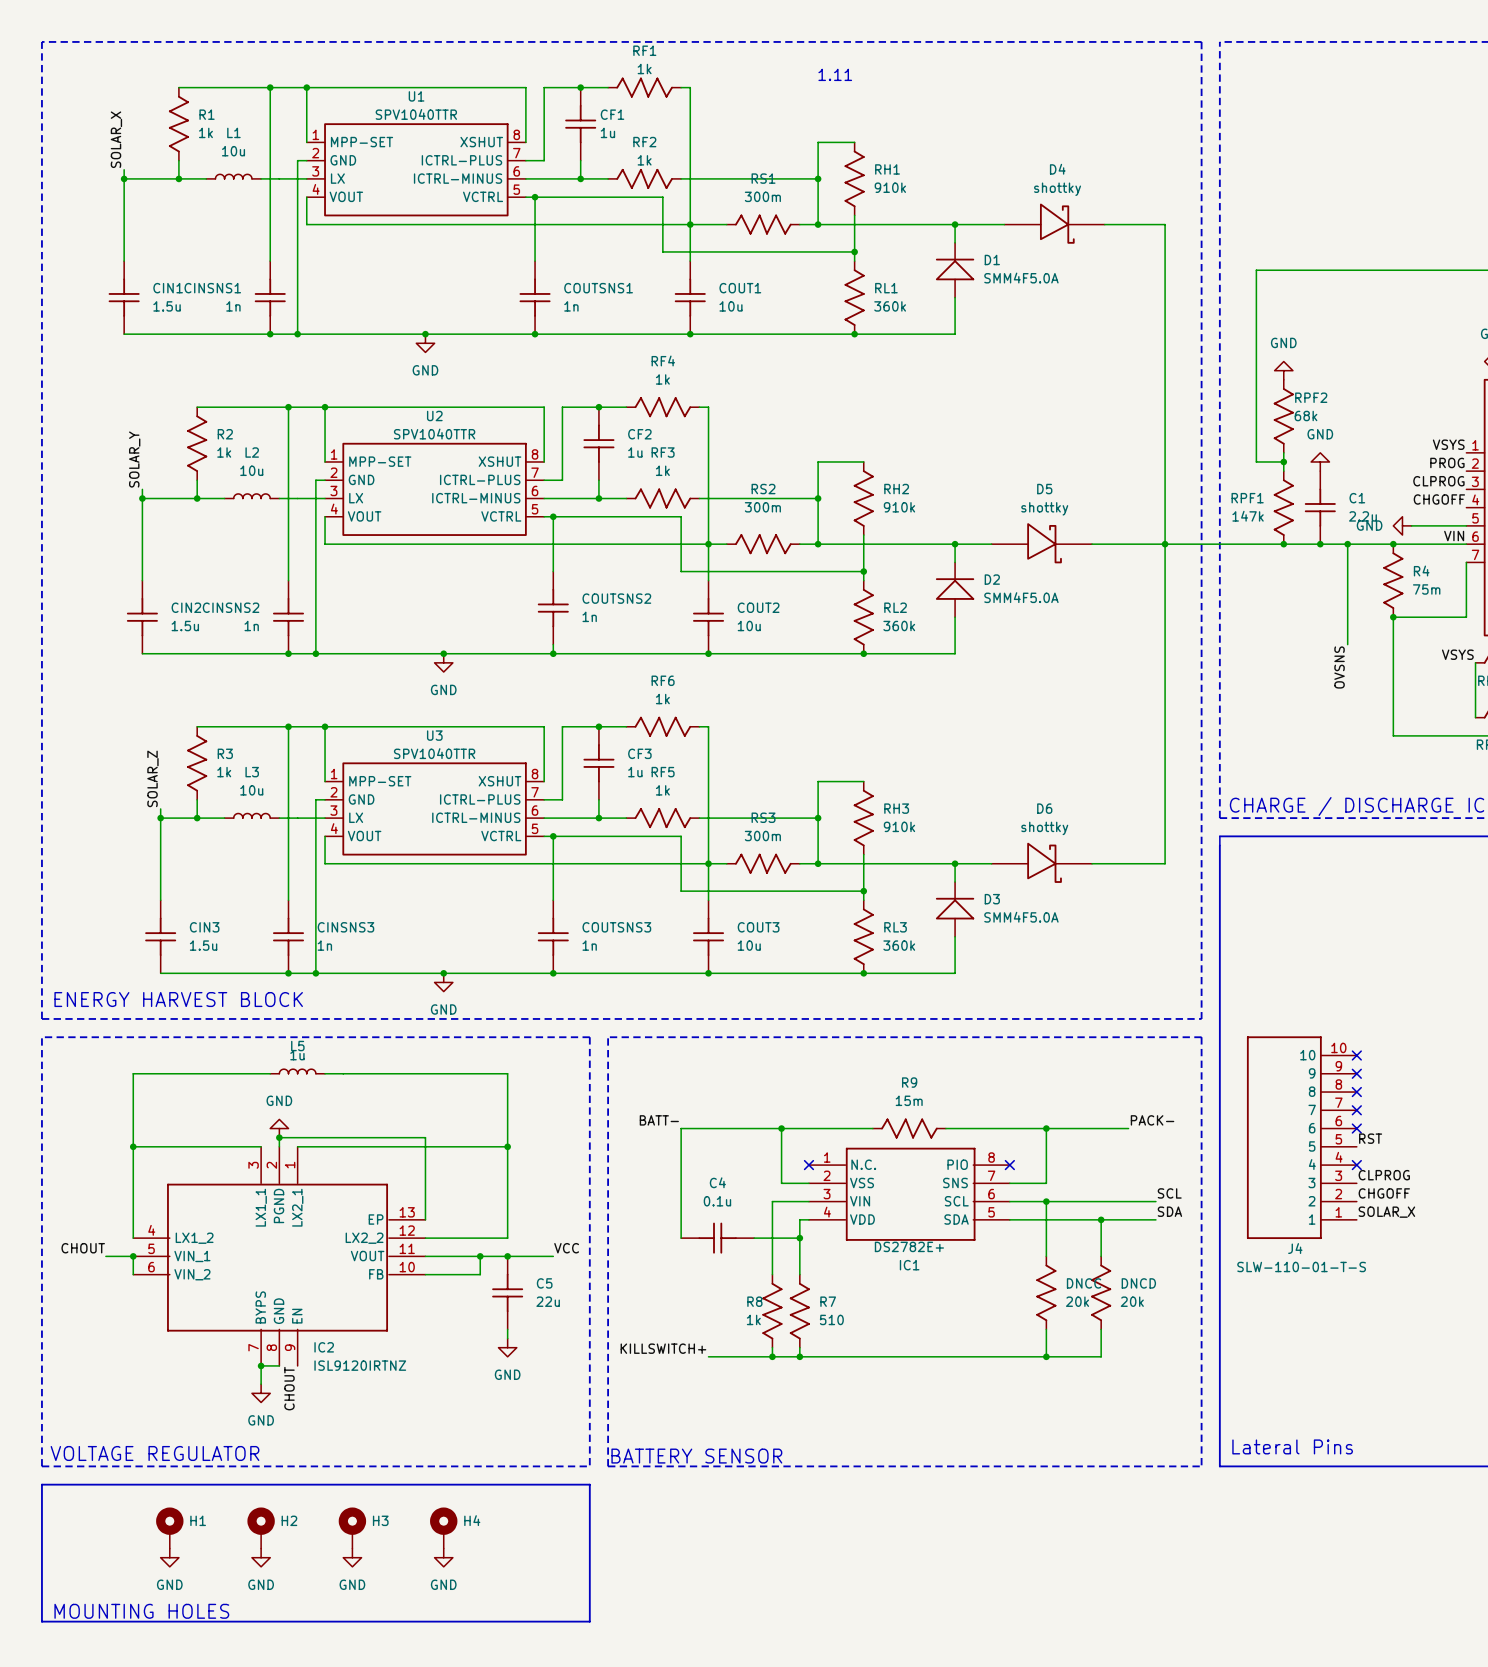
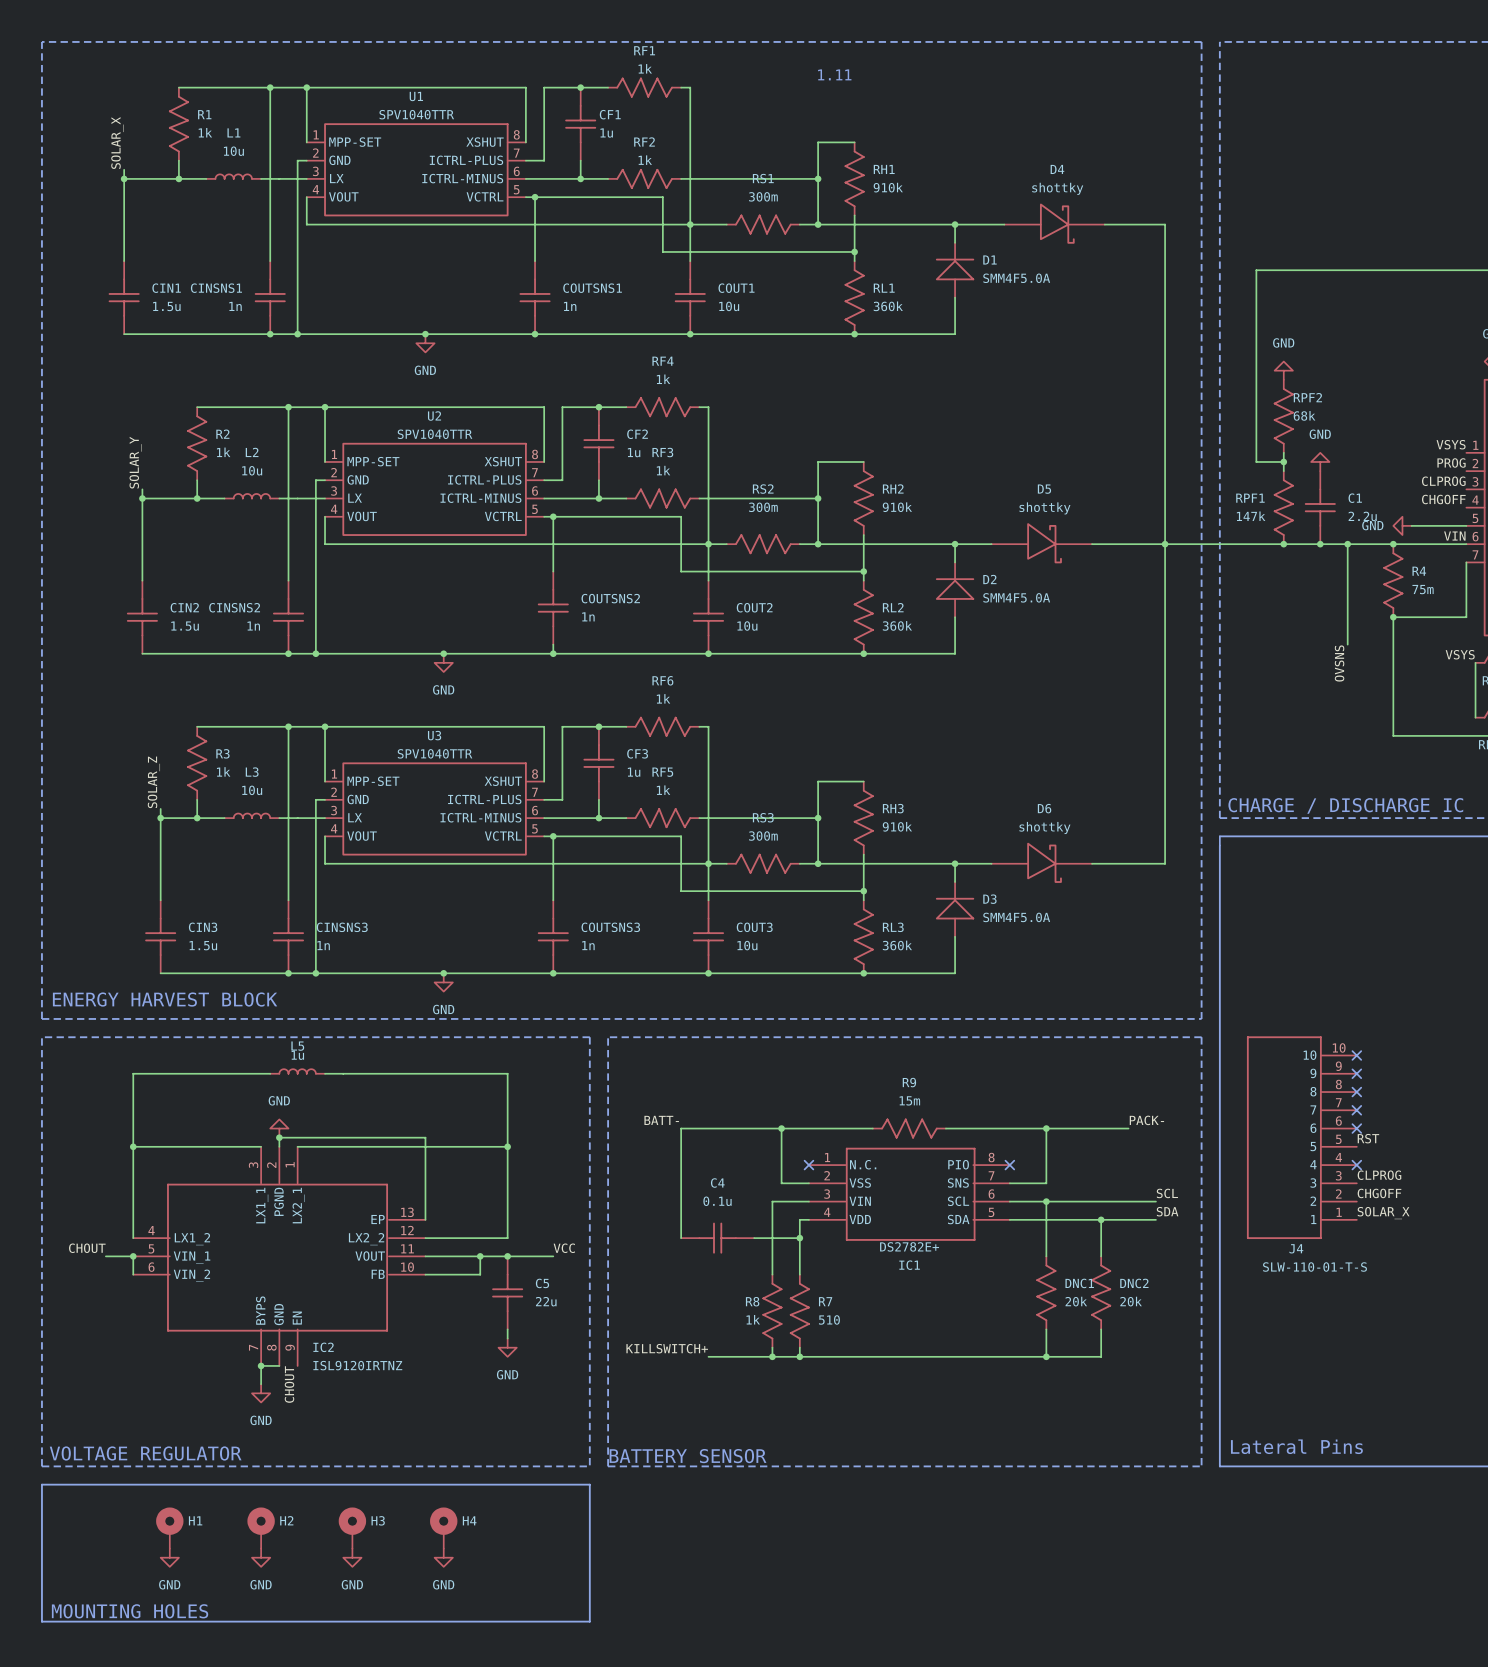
DNCC name: DNCC (1084, 1283) -> DNC1 (1079, 1283)
DNCD name: DNCD (1138, 1283) -> DNC2 (1134, 1283)

